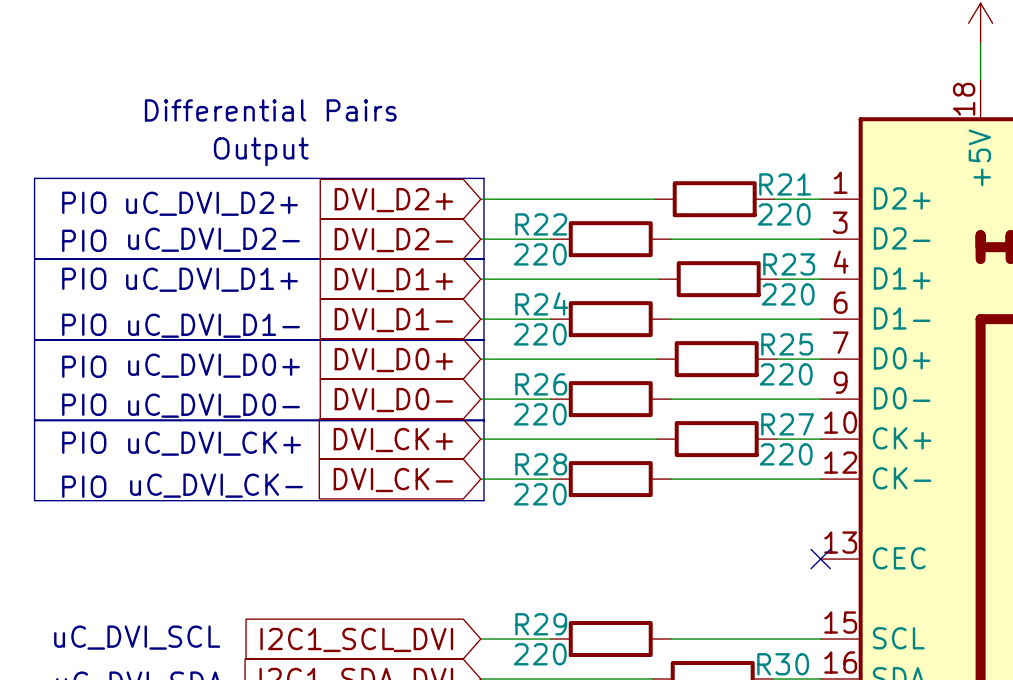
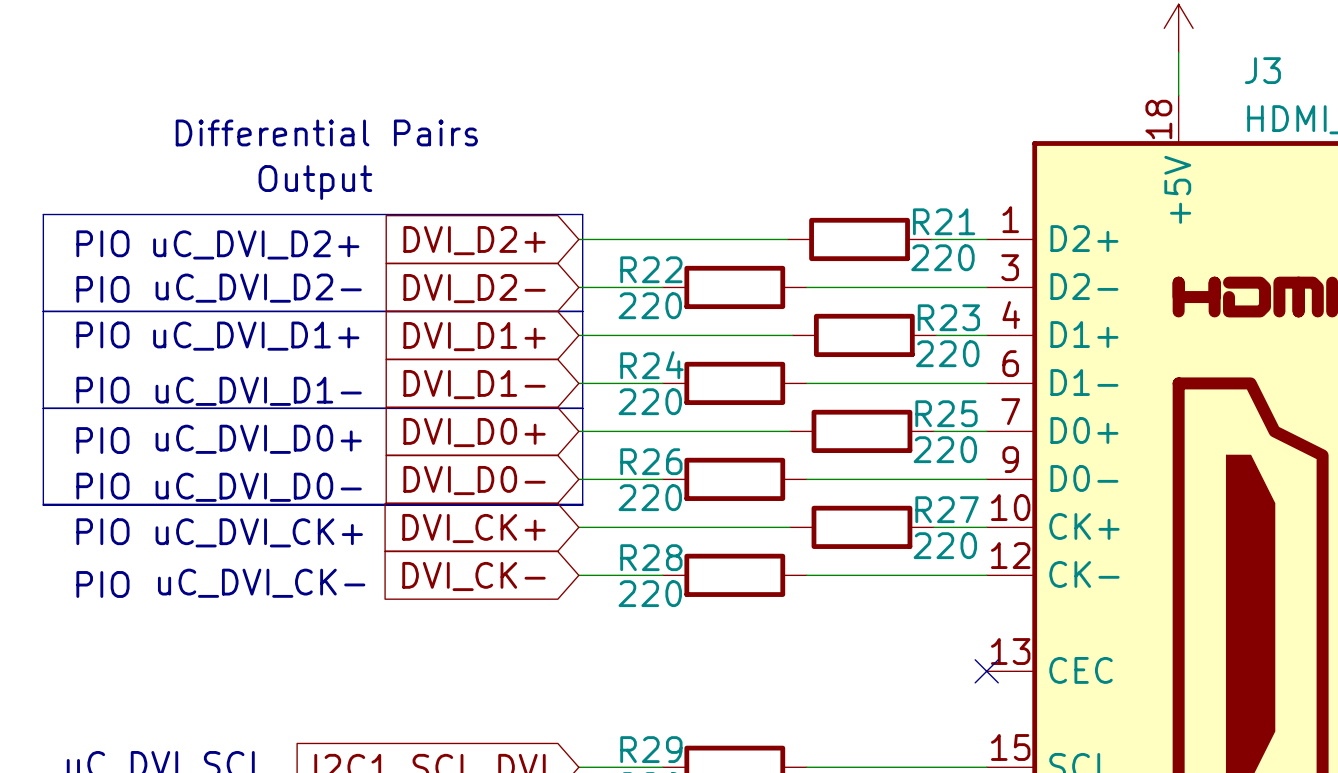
line: (34, 420) (34, 500) (483, 500) (483, 420) -> none

